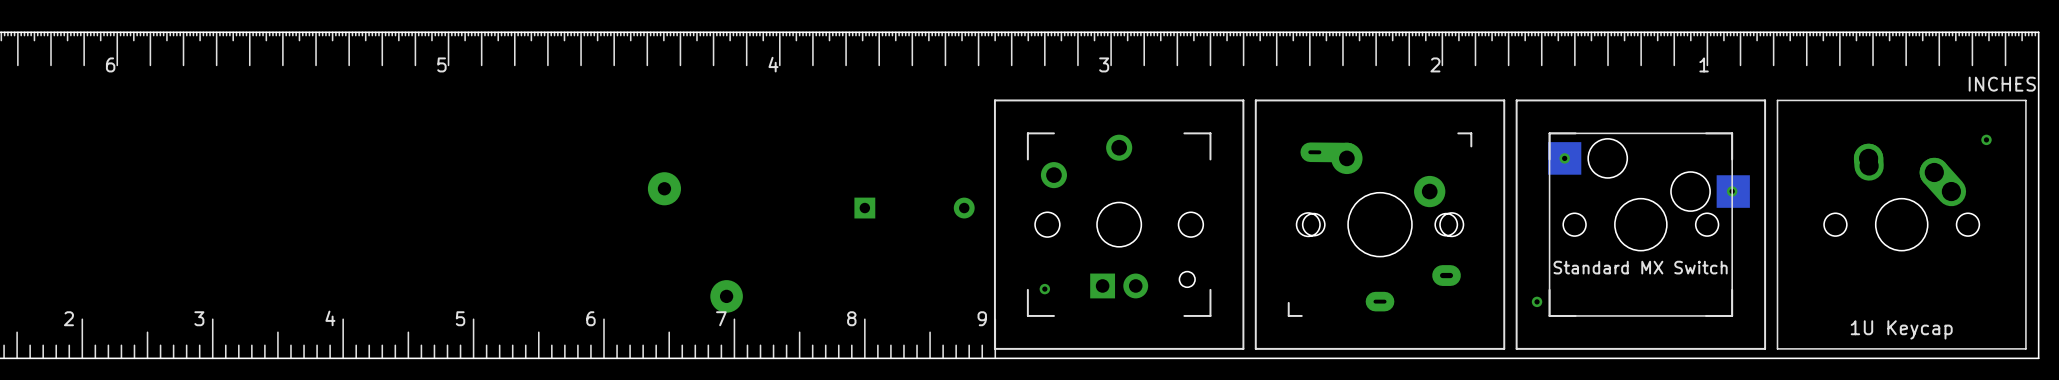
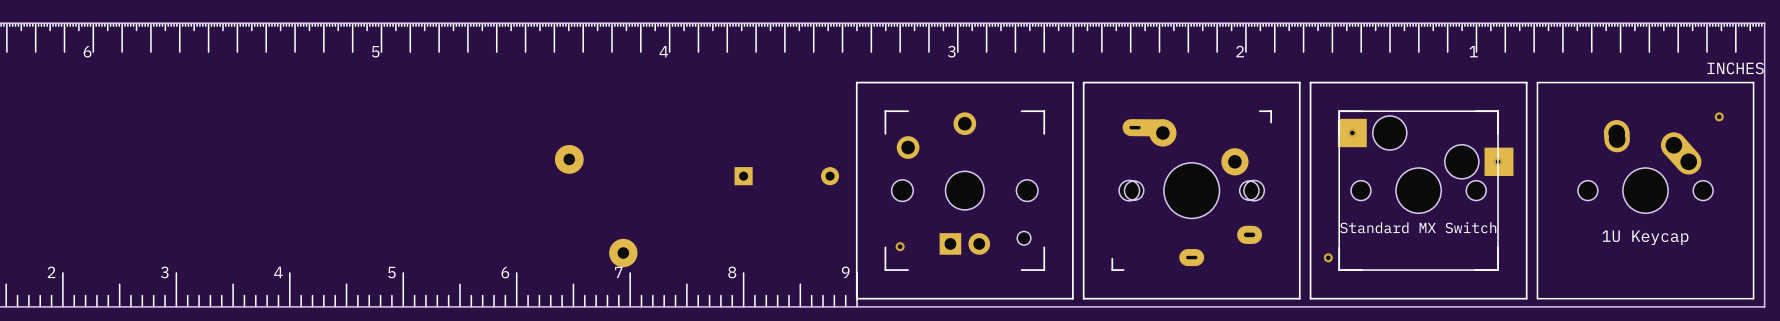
text position: 1U Keycap (1901, 329) -> 1U Keycap (1645, 237)

